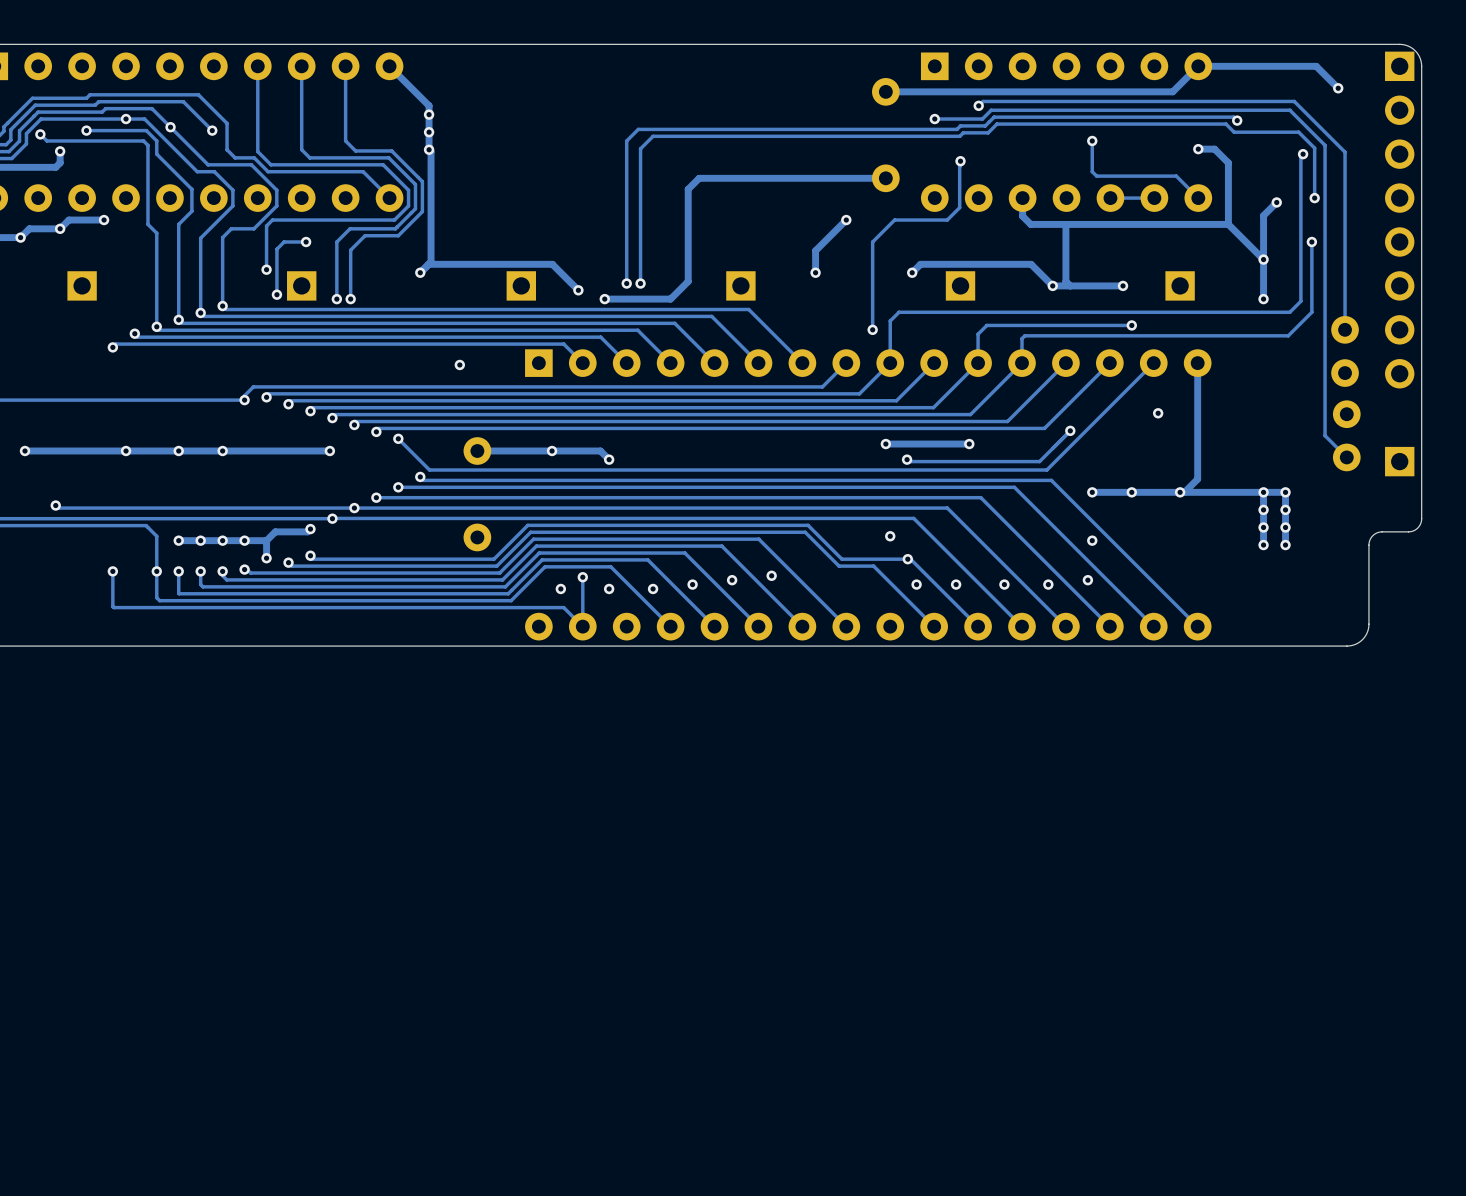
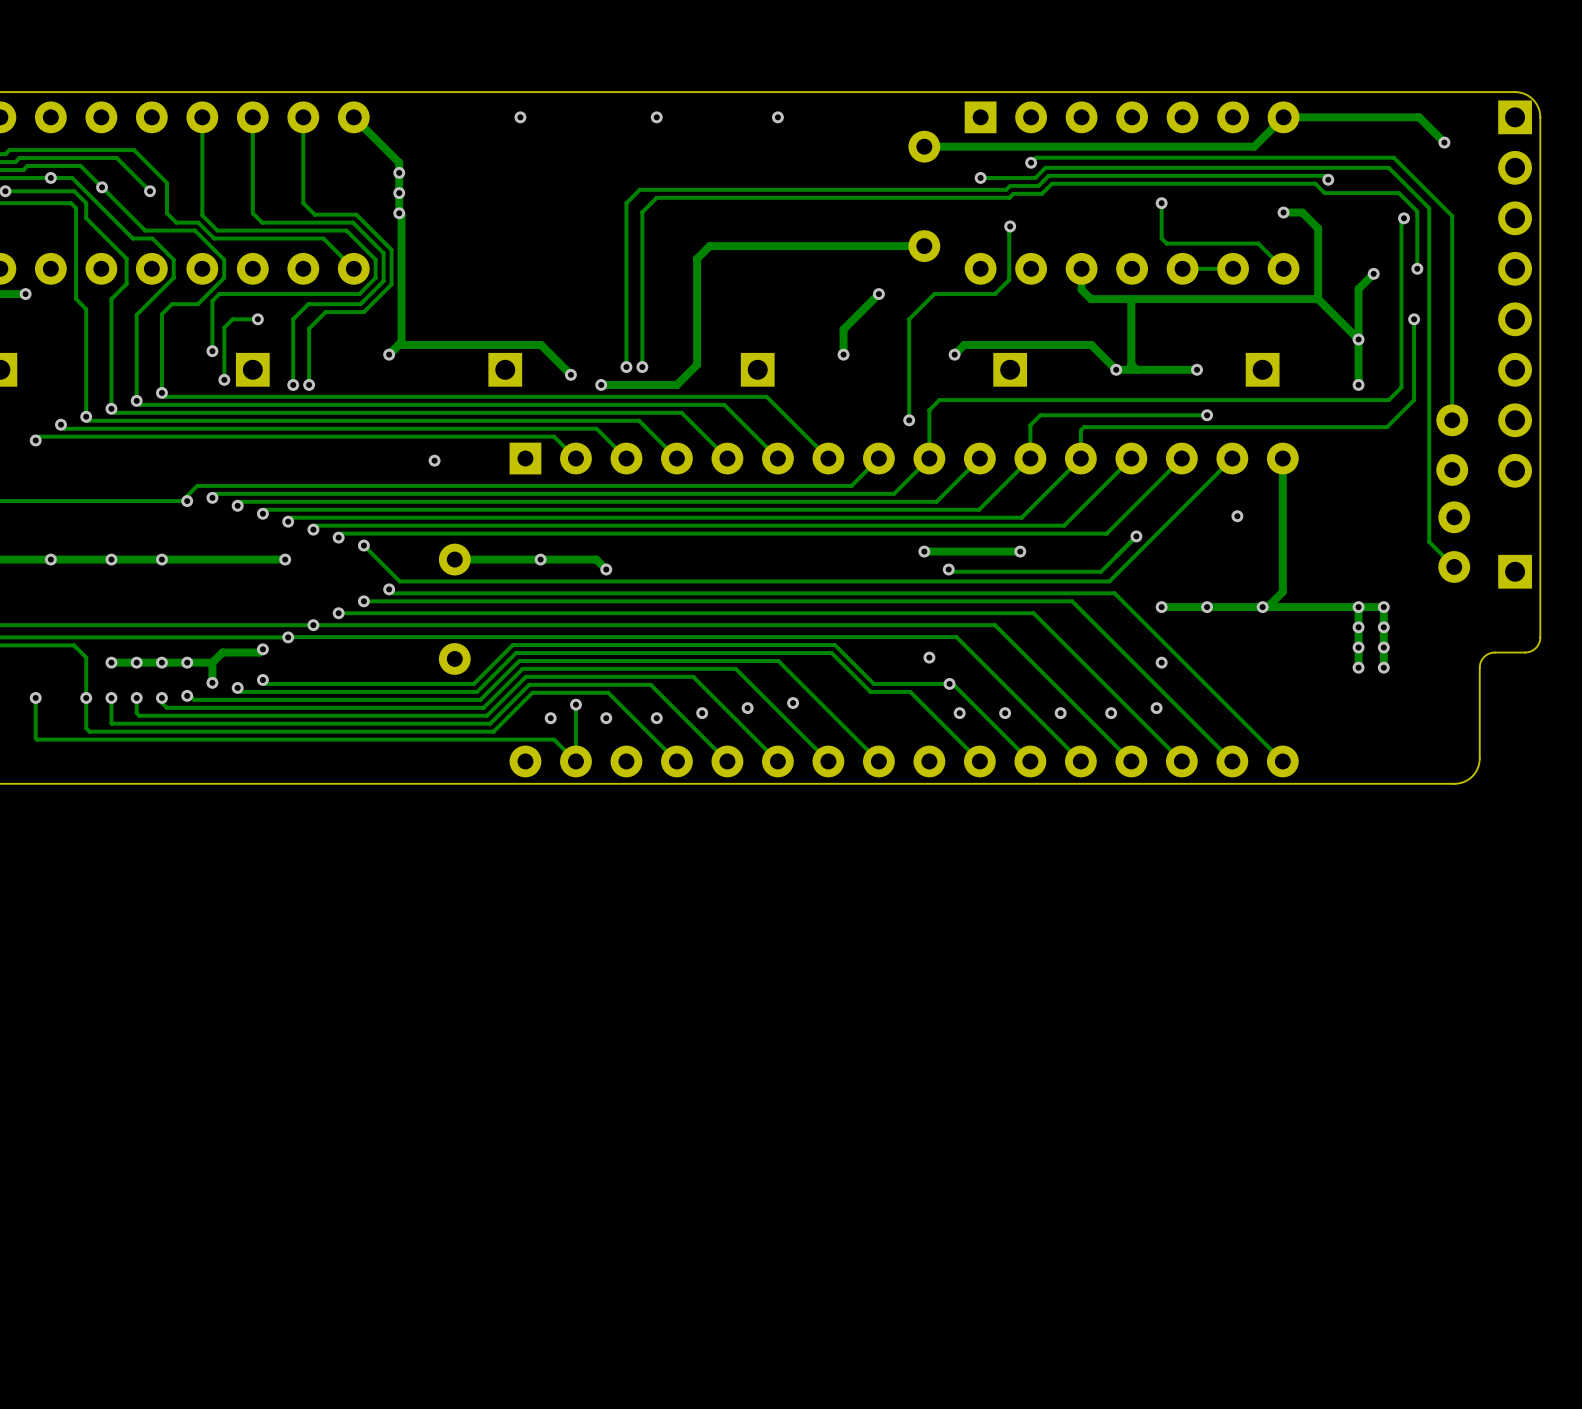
via: none -> (520, 117)
via: none -> (656, 117)
via: none -> (777, 117)

